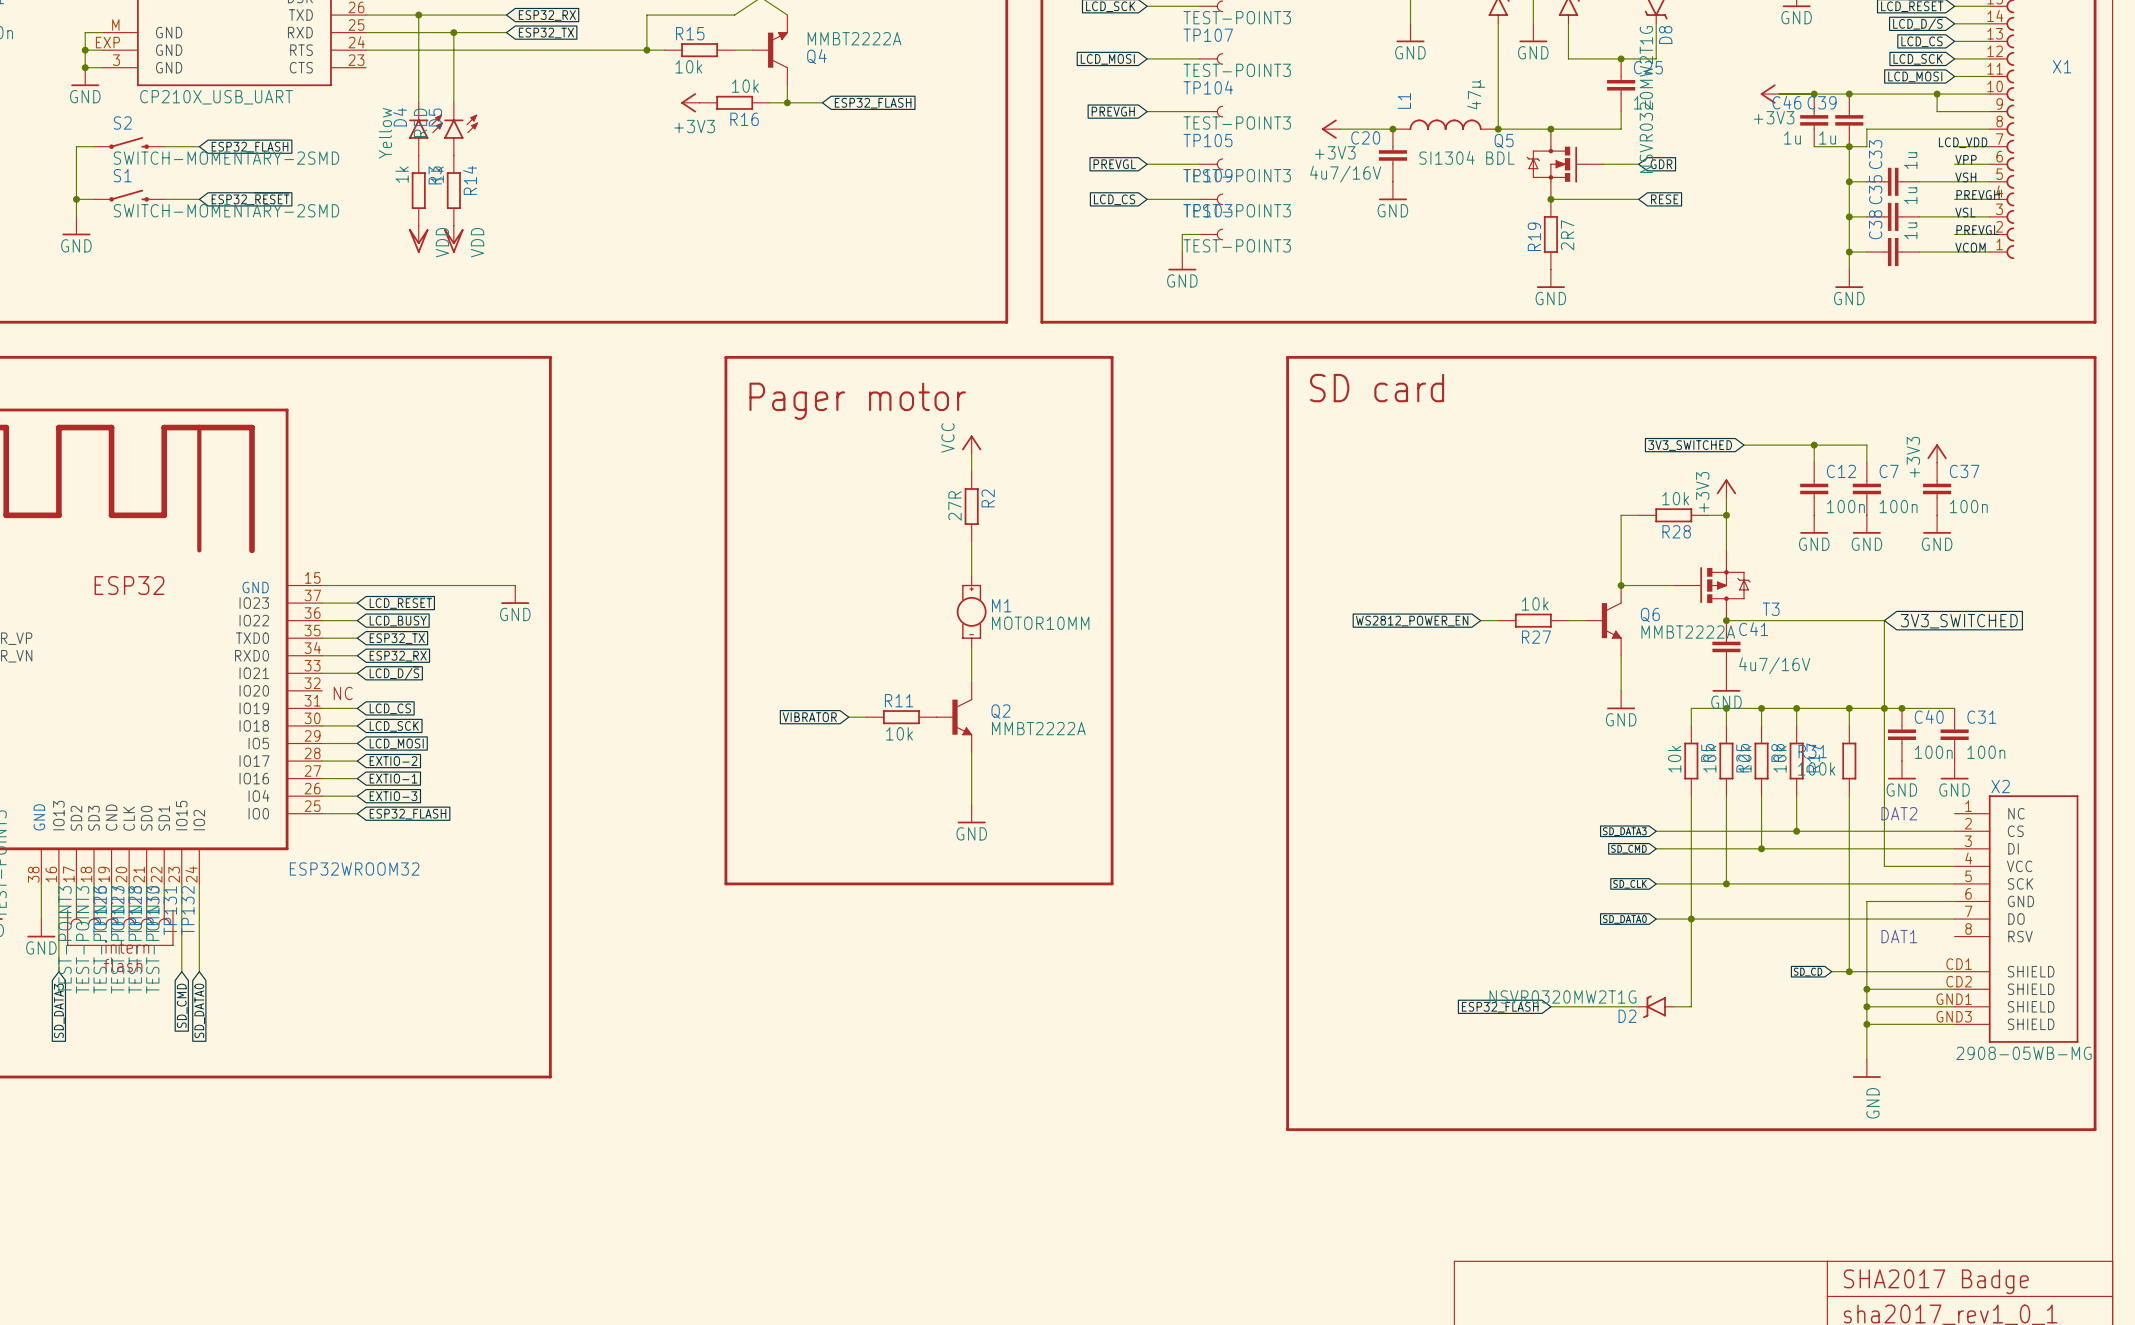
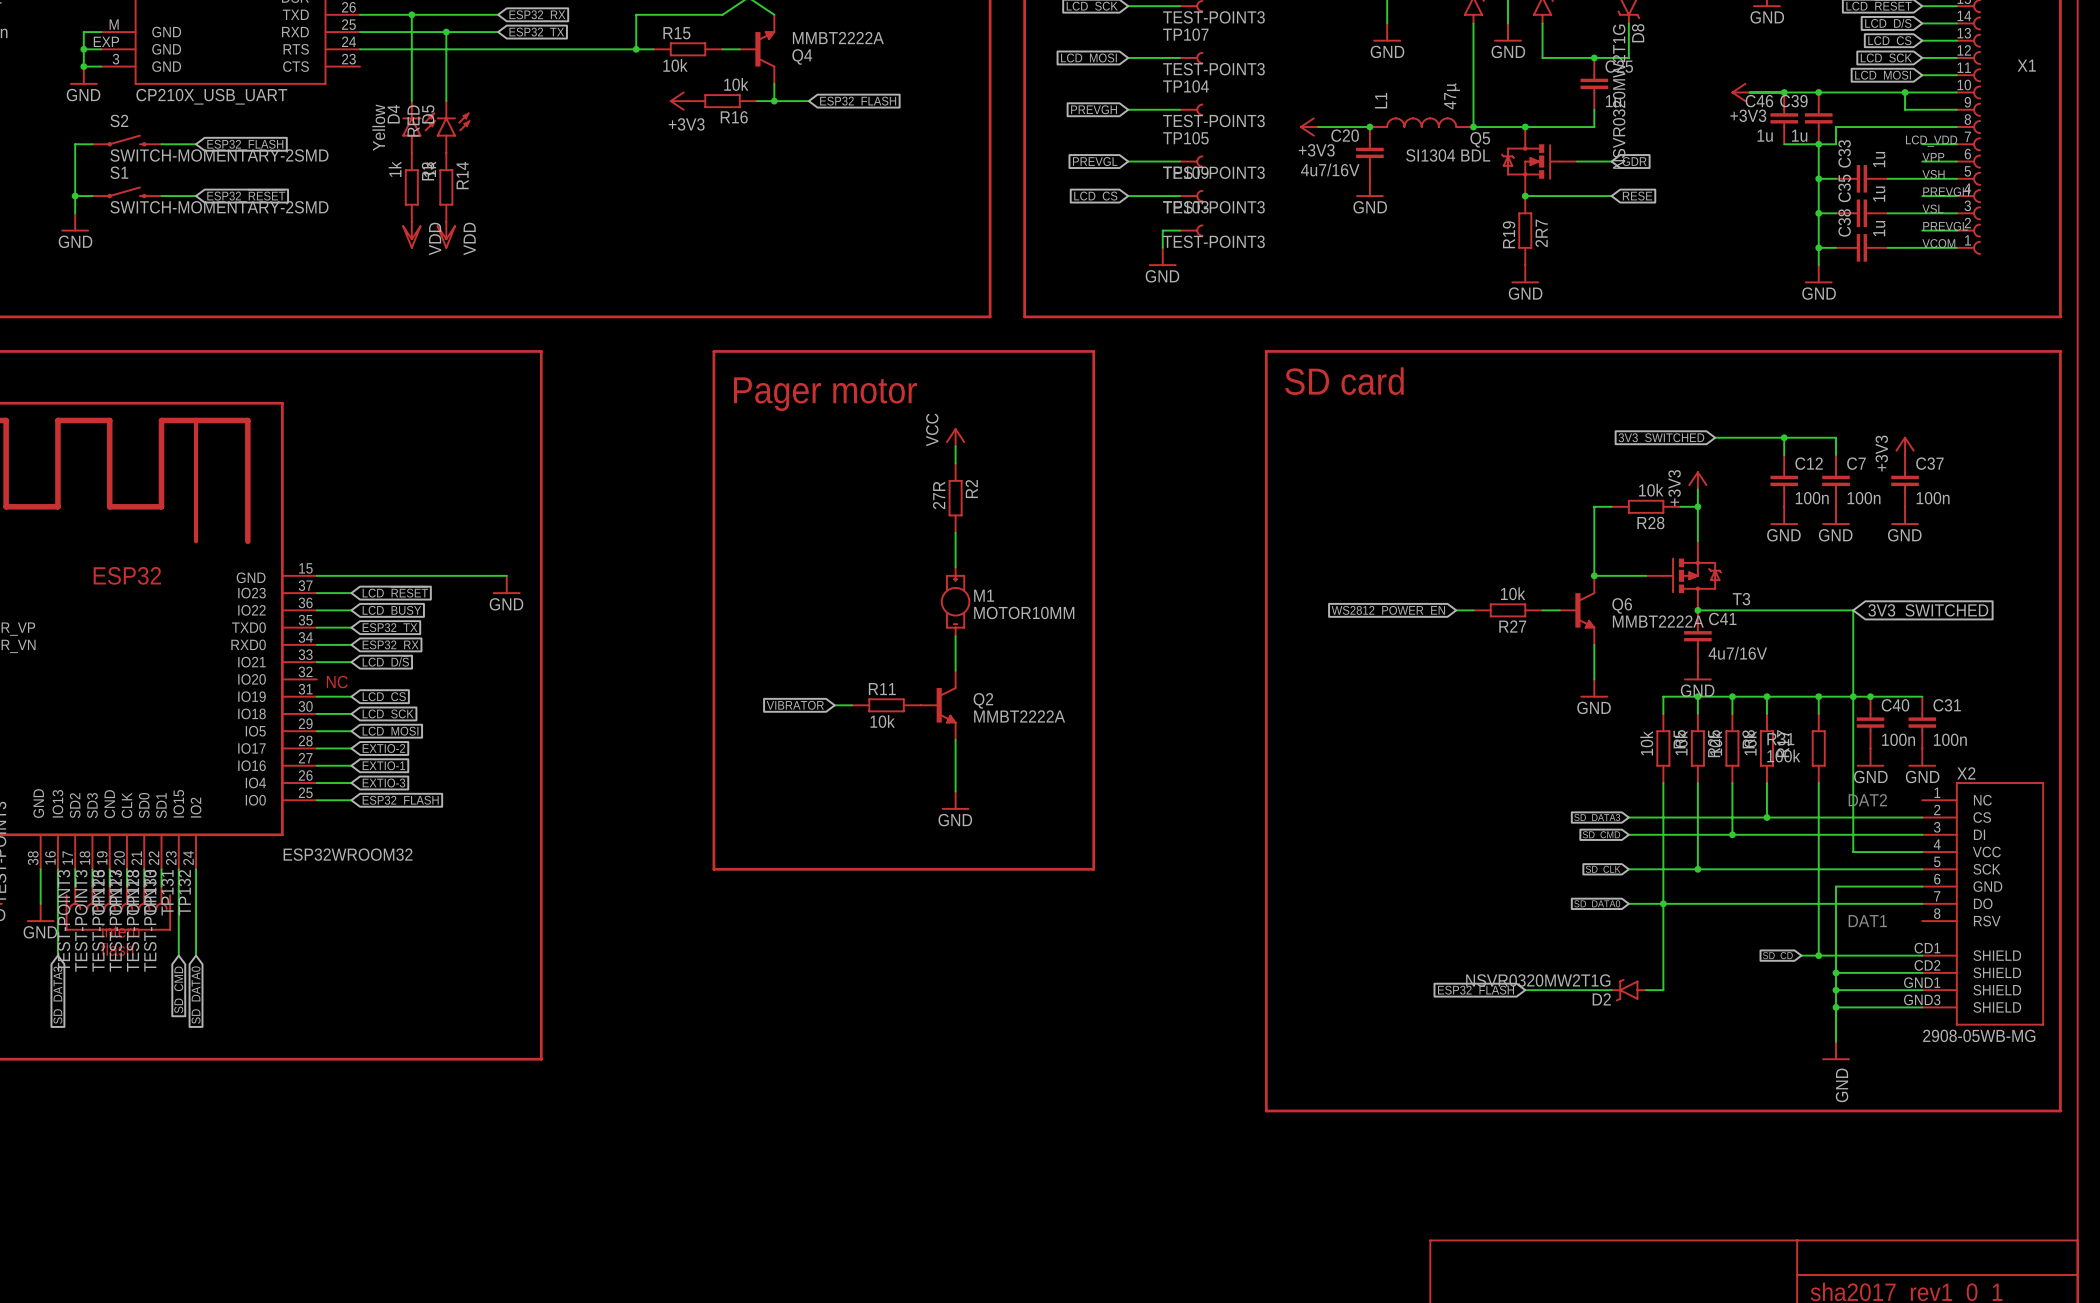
text: SHA2017 Badge (1936, 1281) -> none

